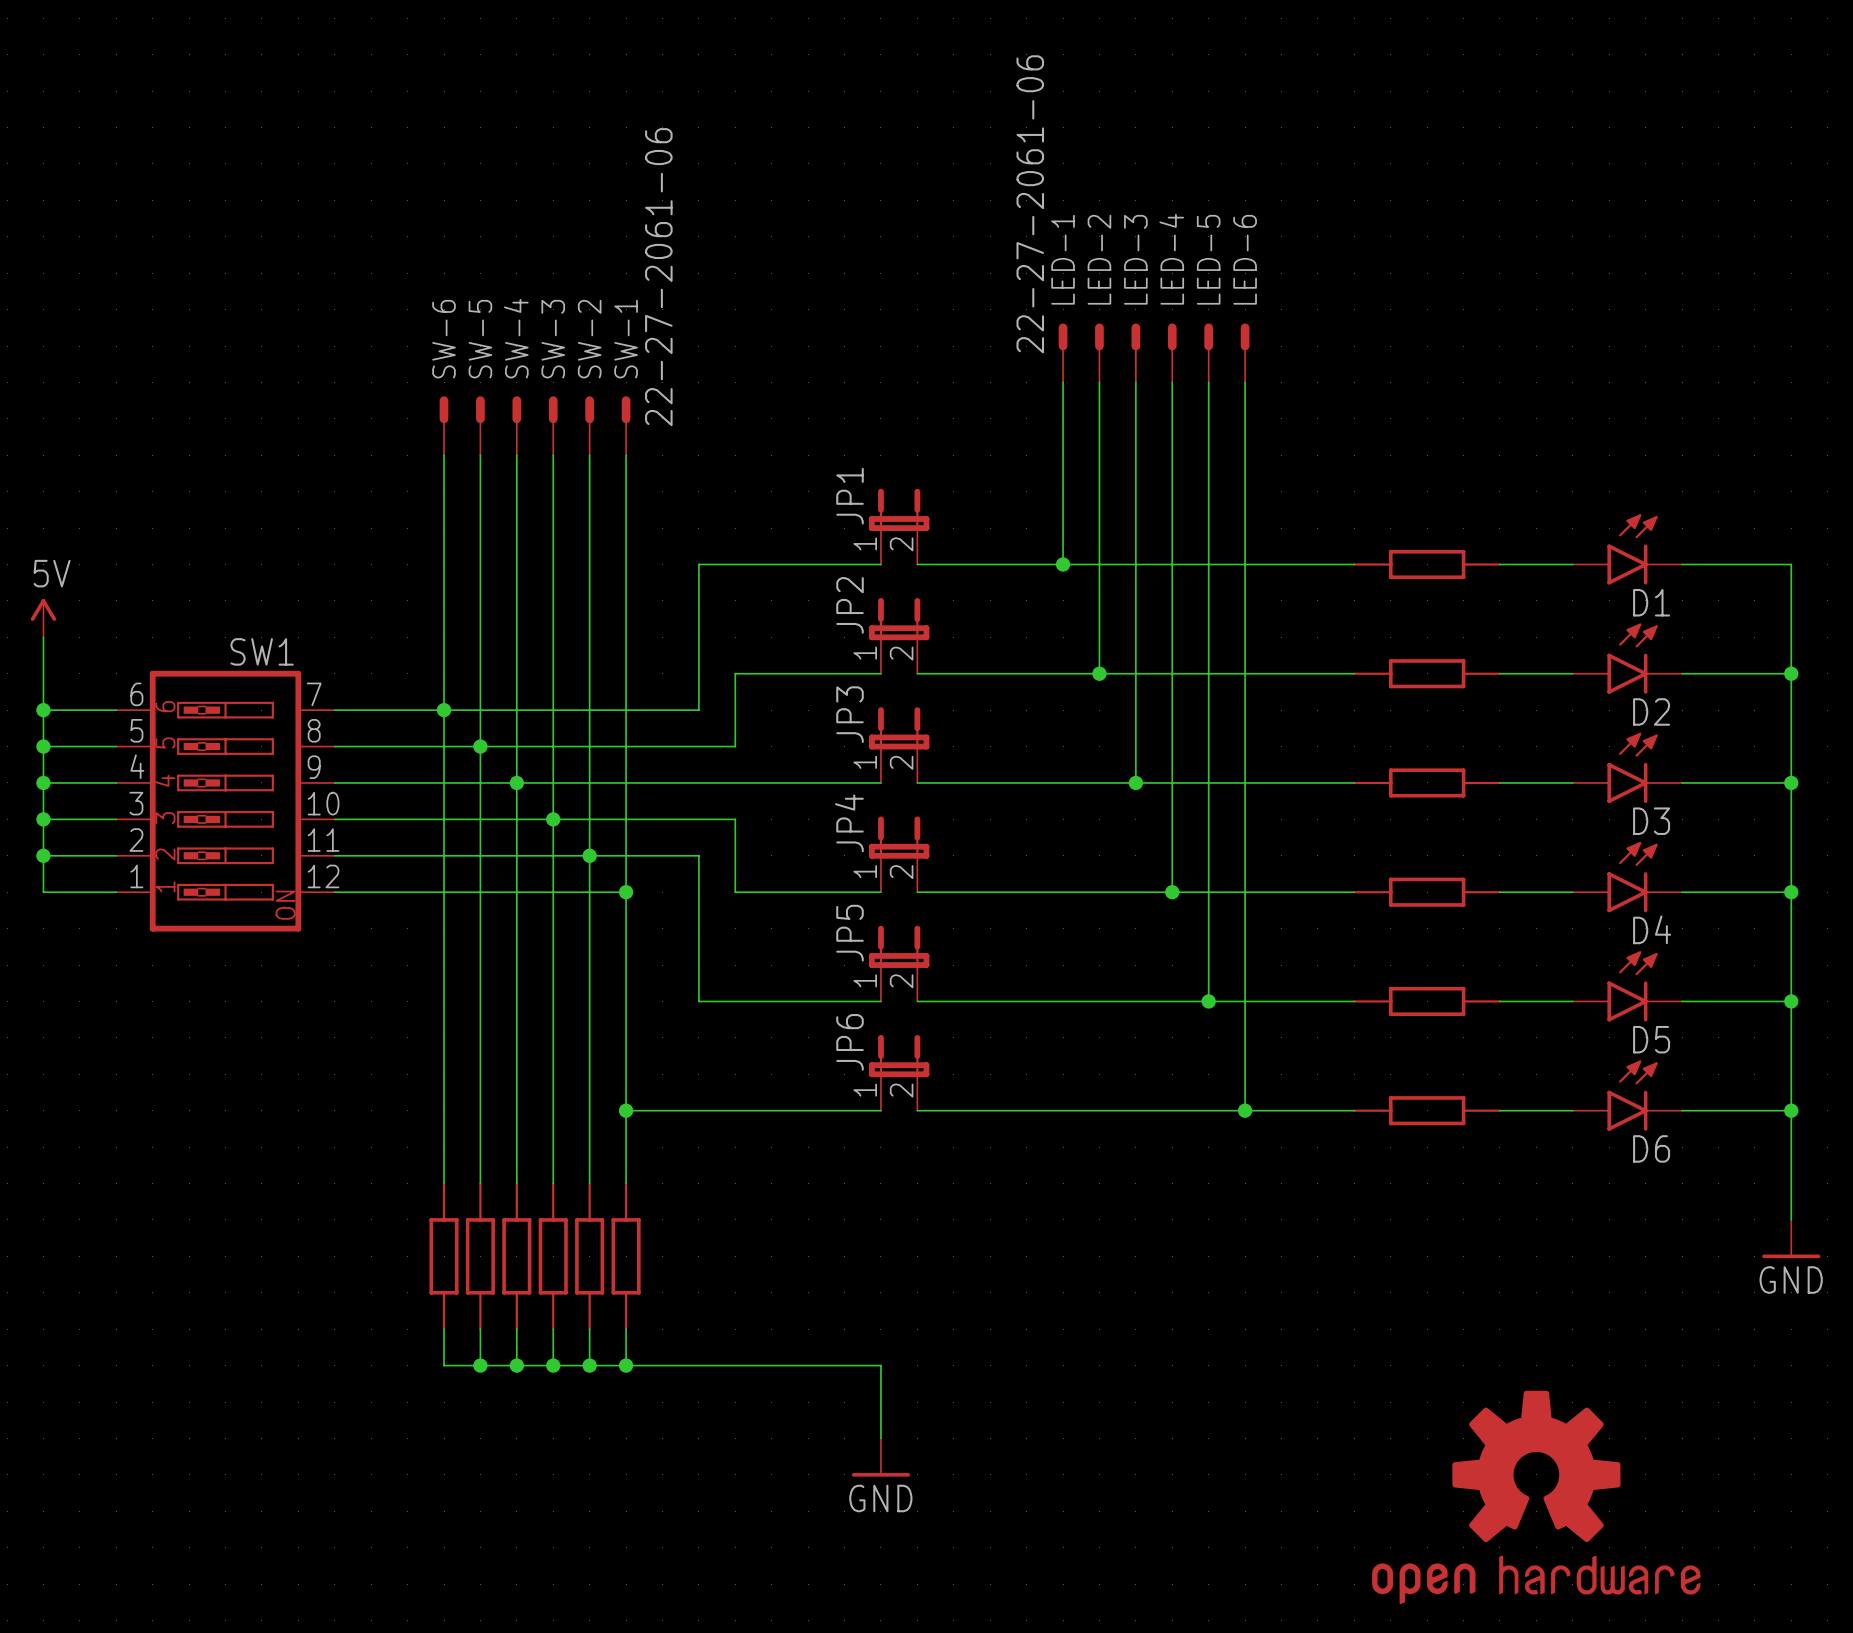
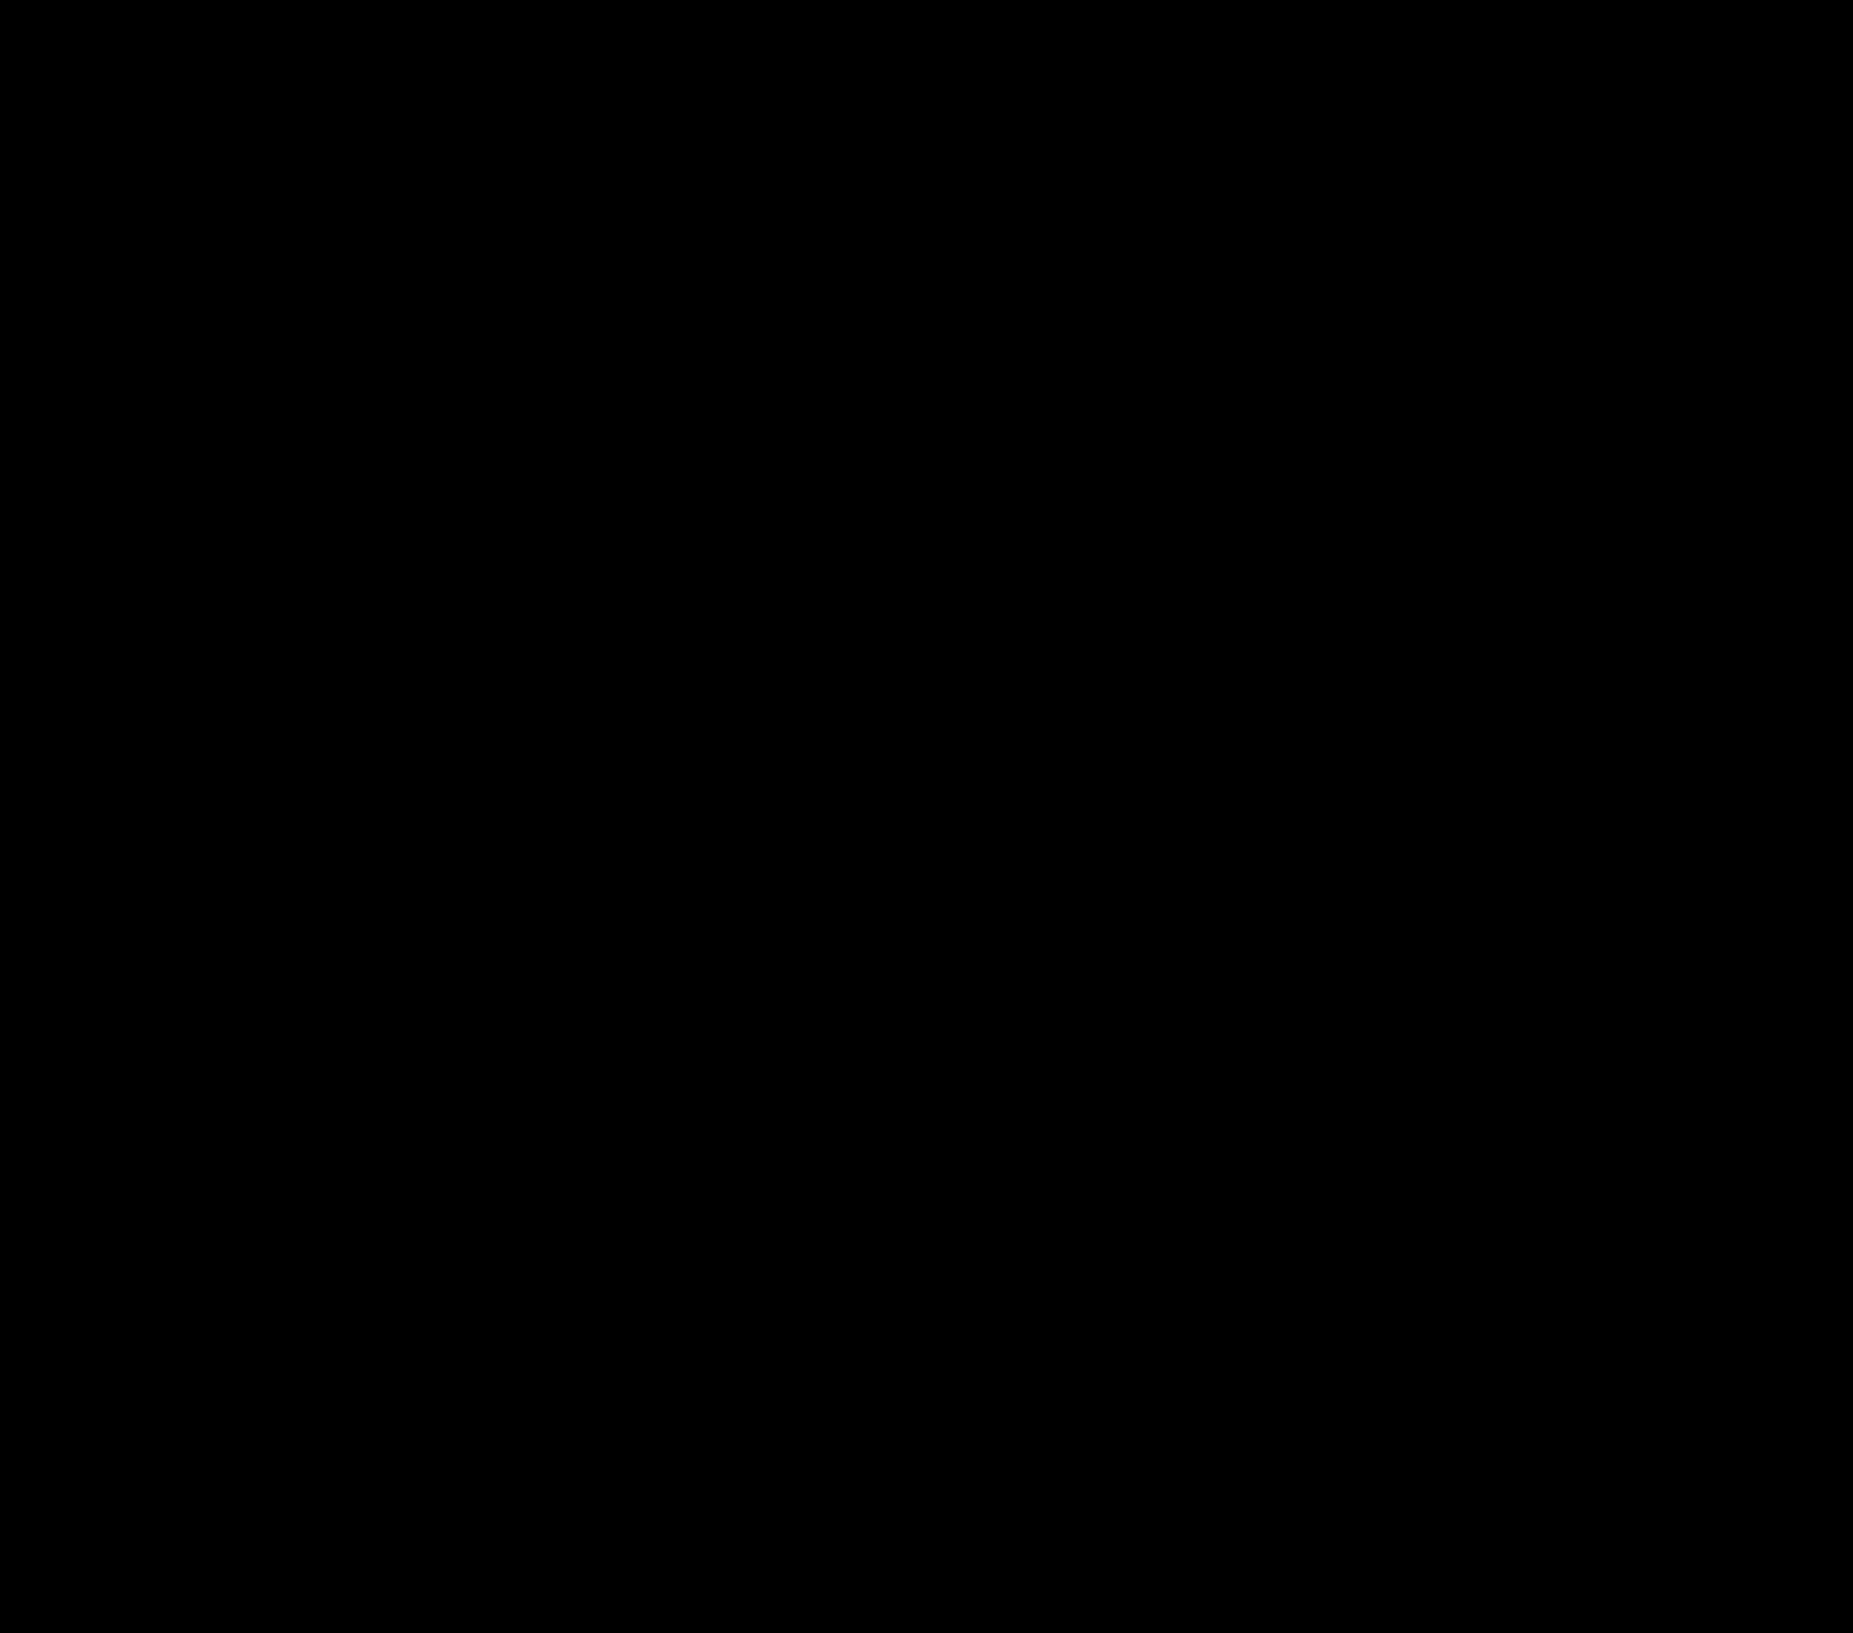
LED-1: 22-27-2061-06 (1063, 352) -> none
LED-2: (1099, 352) -> none
LED-3: (1135, 352) -> none
LED-4: (1172, 352) -> none
LED-5: (1208, 352) -> none
LED-6: (1245, 352) -> none
wire: (1063, 382) (1063, 564) -> none
wire: (1099, 382) (1099, 673) -> none
wire: (1135, 382) (1135, 782) -> none
wire: (1172, 382) (1172, 892) -> none
wire: (1208, 382) (1208, 1001) -> none
wire: (1245, 382) (1245, 1110) -> none
SW-6: (444, 425) -> none
SW-5: (480, 425) -> none
SW-4: (516, 425) -> none
SW-3: (553, 425) -> none
SW-2: (589, 425) -> none
SW-1: 22-27-2061-06 (626, 425) -> none
wire: (444, 455) (444, 1183) -> none
wire: (480, 455) (480, 1183) -> none
wire: (516, 455) (516, 1183) -> none
wire: (553, 455) (553, 1183) -> none
wire: (589, 455) (589, 1183) -> none
wire: (626, 455) (626, 1183) -> none
JP1: (899, 526) -> none
D1: (1627, 549) -> none
wire: (880, 564) (698, 564) (698, 710) (334, 710) -> none
wire: (917, 564) (1354, 564) -> none
junction: (1063, 564) -> none
part: (1427, 564) -> none
wire: (1499, 564) (1572, 564) -> none
wire: (1682, 564) (1791, 564) (1791, 1219) -> none
power symbol: 5V (43, 618) -> none
JP2: (899, 635) -> none
wire: (43, 637) (43, 892) (116, 892) -> none
D2: (1627, 658) -> none
wire: (880, 673) (735, 673) (735, 746) (334, 746) -> none
wire: (917, 673) (1354, 673) -> none
junction: (1099, 673) -> none
part: (1427, 673) -> none
wire: (1499, 673) (1572, 673) -> none
wire: (1682, 673) (1791, 673) -> none
junction: (1791, 673) -> none
wire: (43, 710) (116, 710) -> none
junction: (43, 710) -> none
junction: (444, 710) -> none
JP3: (899, 745) -> none
wire: (43, 746) (116, 746) -> none
junction: (43, 746) -> none
junction: (480, 746) -> none
D3: (1627, 767) -> none
wire: (43, 782) (116, 782) -> none
junction: (43, 782) -> none
wire: (334, 782) (880, 782) -> none
junction: (516, 782) -> none
wire: (917, 782) (1354, 782) -> none
junction: (1135, 782) -> none
part: (1427, 782) -> none
wire: (1499, 782) (1572, 782) -> none
wire: (1682, 782) (1791, 782) -> none
junction: (1791, 782) -> none
SW1: (225, 801) -> none
wire: (43, 819) (116, 819) -> none
junction: (43, 819) -> none
wire: (334, 819) (735, 819) (735, 892) (880, 892) -> none
junction: (553, 819) -> none
JP4: (899, 854) -> none
wire: (43, 855) (116, 855) -> none
junction: (43, 855) -> none
wire: (334, 855) (698, 855) (698, 1001) (880, 1001) -> none
junction: (589, 855) -> none
D4: (1627, 877) -> none
wire: (334, 892) (626, 892) -> none
junction: (626, 892) -> none
wire: (917, 892) (1354, 892) -> none
junction: (1172, 892) -> none
part: (1427, 892) -> none
wire: (1499, 892) (1572, 892) -> none
wire: (1682, 892) (1791, 892) -> none
junction: (1791, 892) -> none
JP5: (899, 963) -> none
D5: (1627, 986) -> none
wire: (917, 1001) (1354, 1001) -> none
junction: (1208, 1001) -> none
part: (1427, 1001) -> none
wire: (1499, 1001) (1572, 1001) -> none
wire: (1682, 1001) (1791, 1001) -> none
junction: (1791, 1001) -> none
JP6: (899, 1072) -> none
D6: (1627, 1095) -> none
wire: (626, 1110) (880, 1110) -> none
junction: (626, 1110) -> none
wire: (917, 1110) (1354, 1110) -> none
junction: (1245, 1110) -> none
part: (1427, 1110) -> none
wire: (1499, 1110) (1572, 1110) -> none
wire: (1682, 1110) (1791, 1110) -> none
junction: (1791, 1110) -> none
power symbol: GND (1791, 1239) -> none
part: (444, 1256) -> none
part: (480, 1256) -> none
part: (516, 1256) -> none
part: (553, 1256) -> none
part: (589, 1256) -> none
part: (626, 1256) -> none
wire: (444, 1329) (444, 1365) (880, 1365) (880, 1438) -> none
wire: (480, 1329) (480, 1365) -> none
wire: (516, 1329) (516, 1365) -> none
wire: (553, 1329) (553, 1365) -> none
wire: (589, 1329) (589, 1365) -> none
wire: (626, 1329) (626, 1365) -> none
junction: (480, 1365) -> none
junction: (516, 1365) -> none
junction: (553, 1365) -> none
junction: (589, 1365) -> none
junction: (626, 1365) -> none
power symbol: GND (880, 1457) -> none
part: (1536, 1497) -> none

